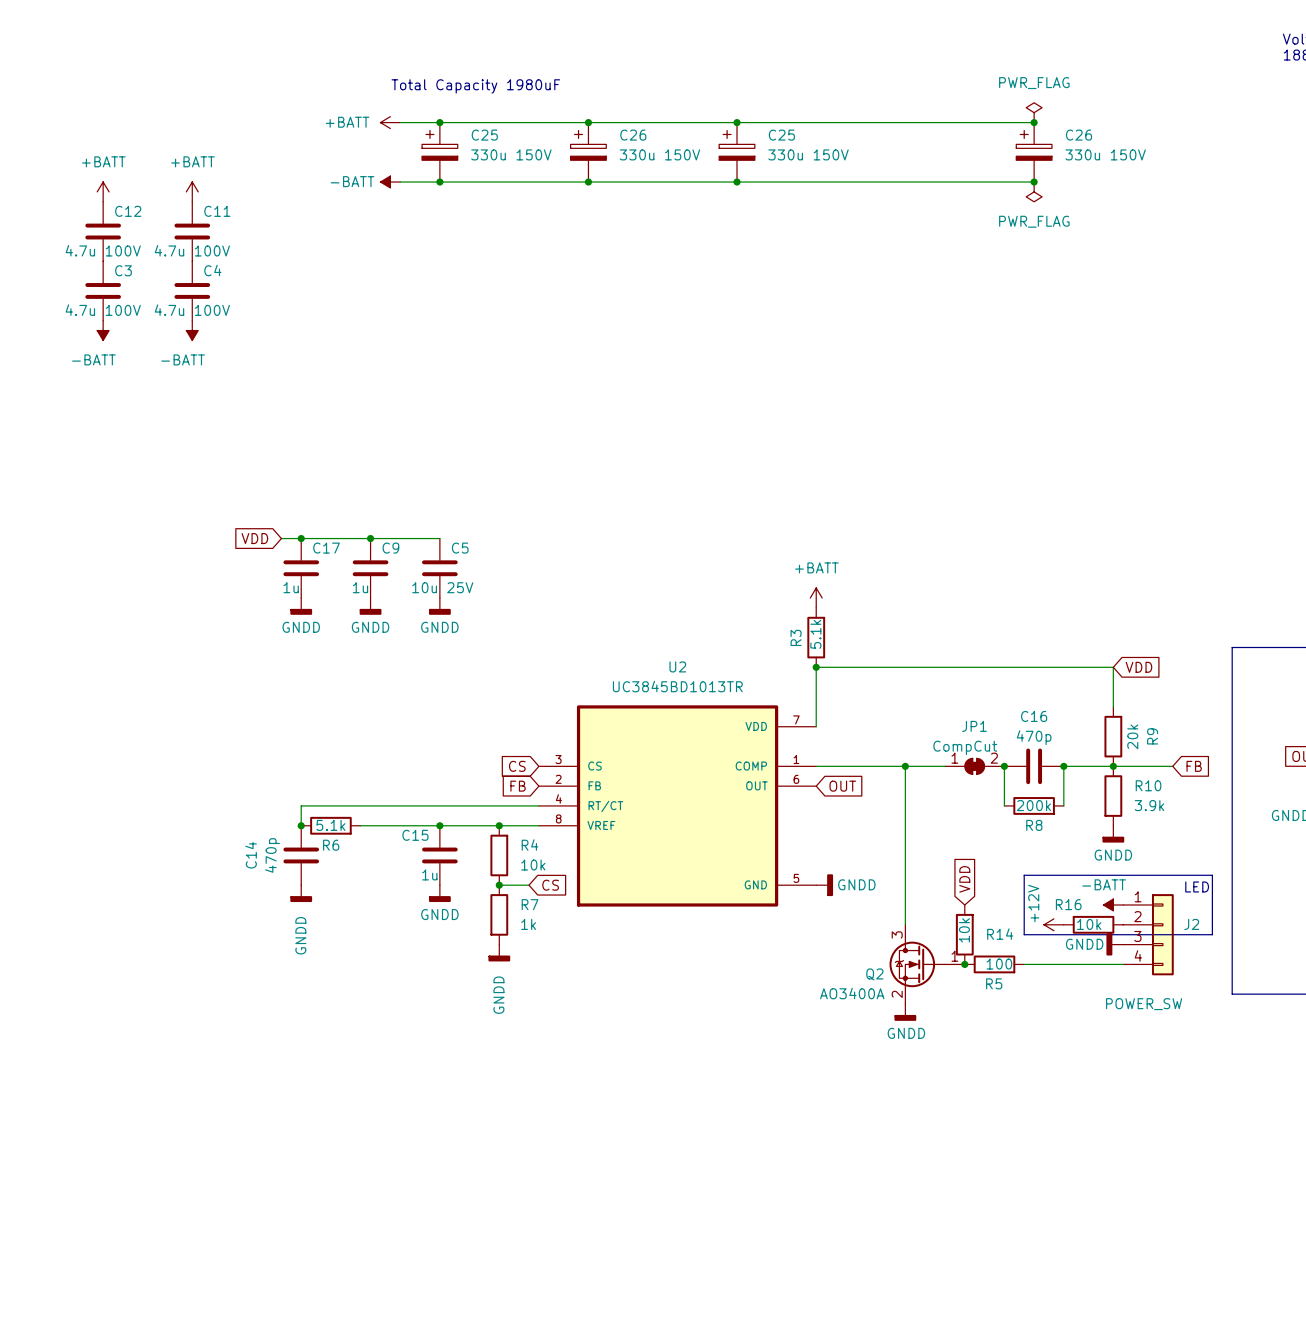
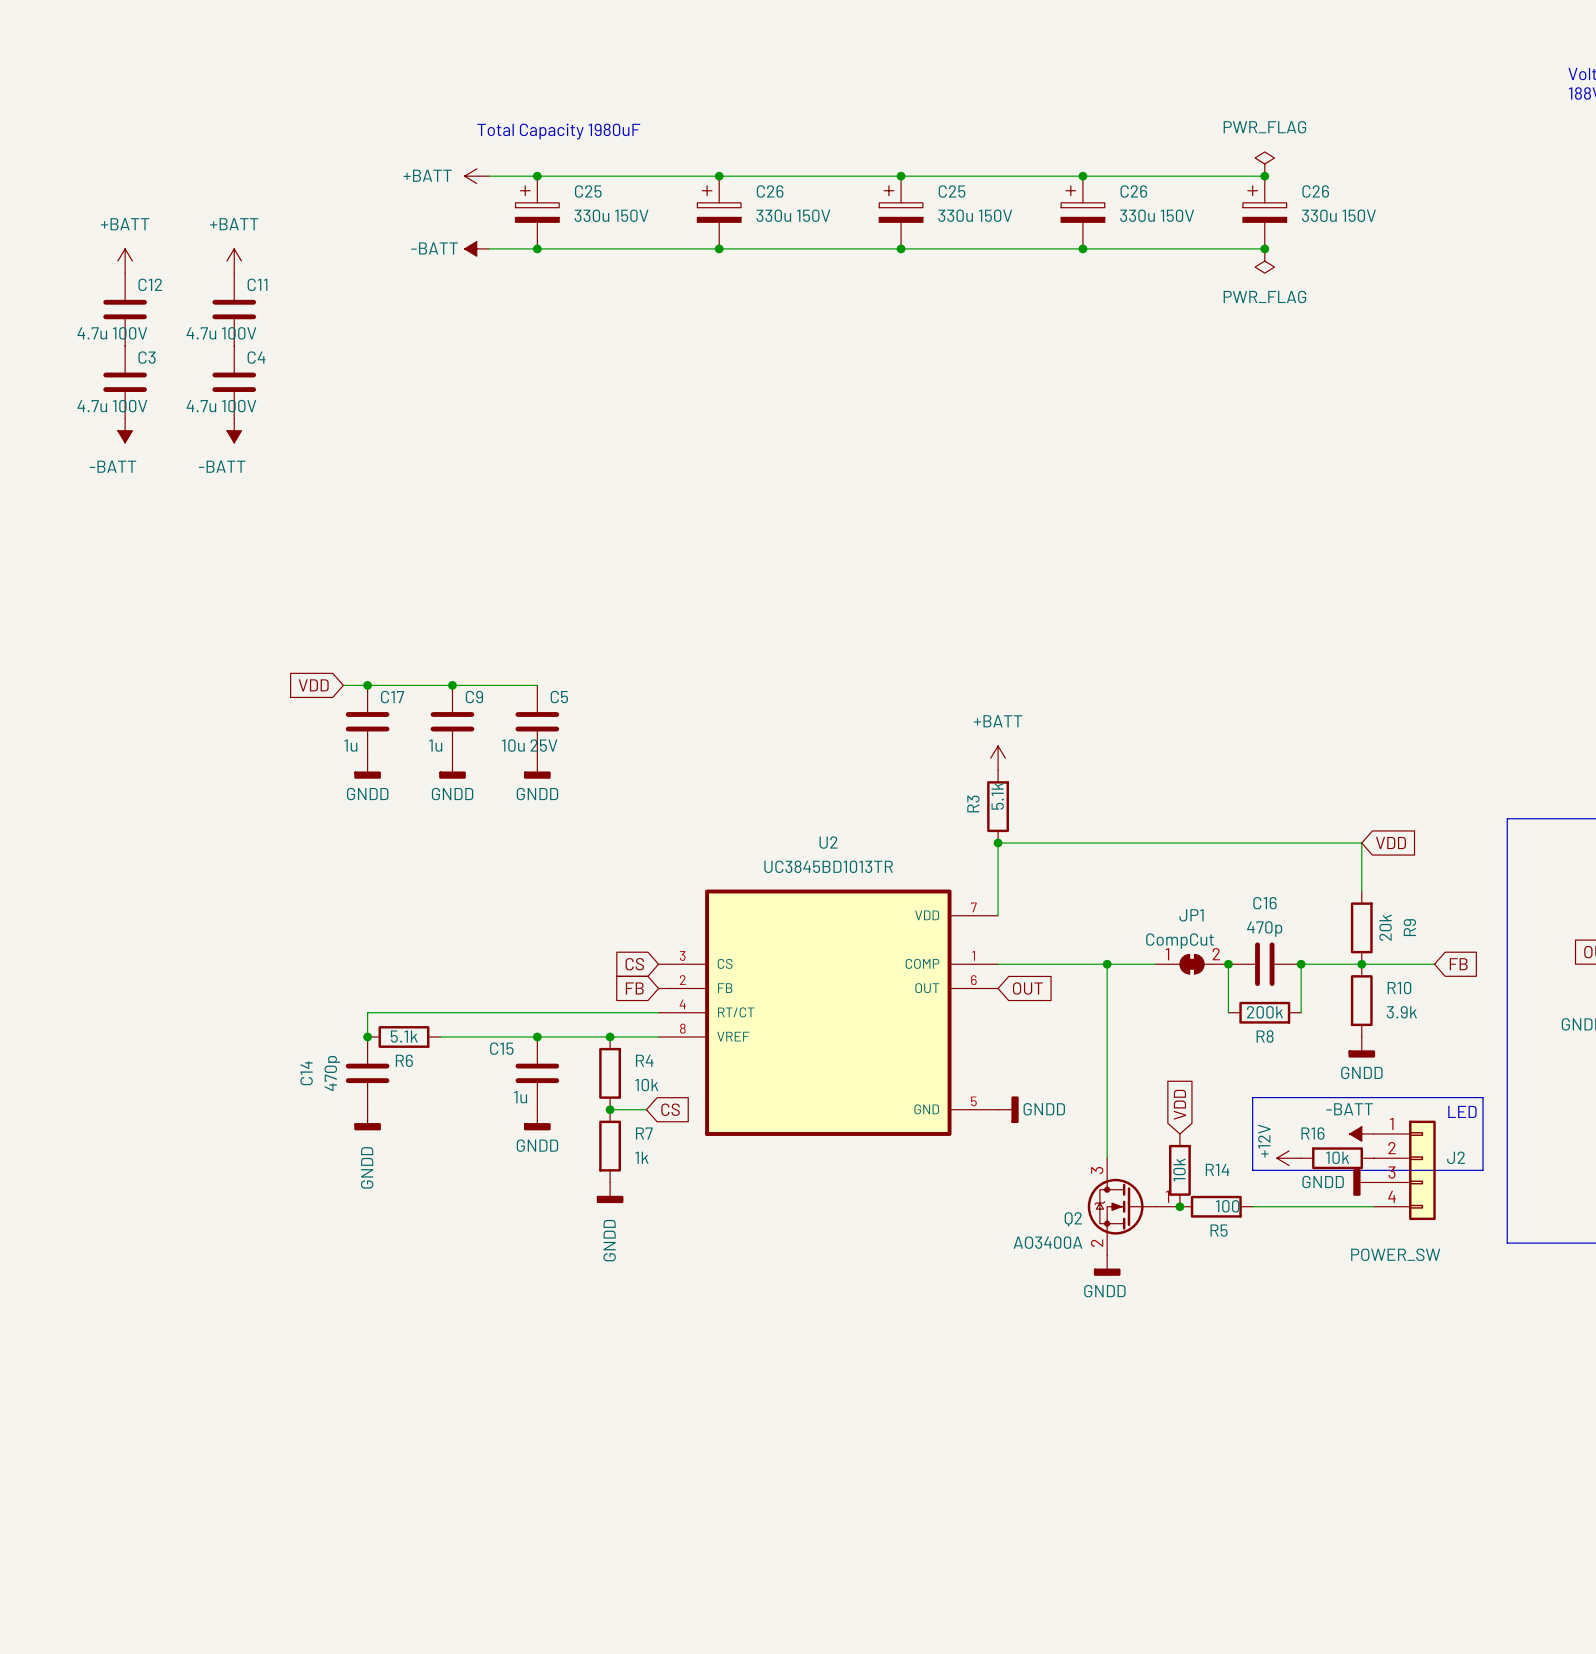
junction: none -> (1082, 176)
C26: none -> 330u 150V (1082, 212)
junction: none -> (1082, 248)

